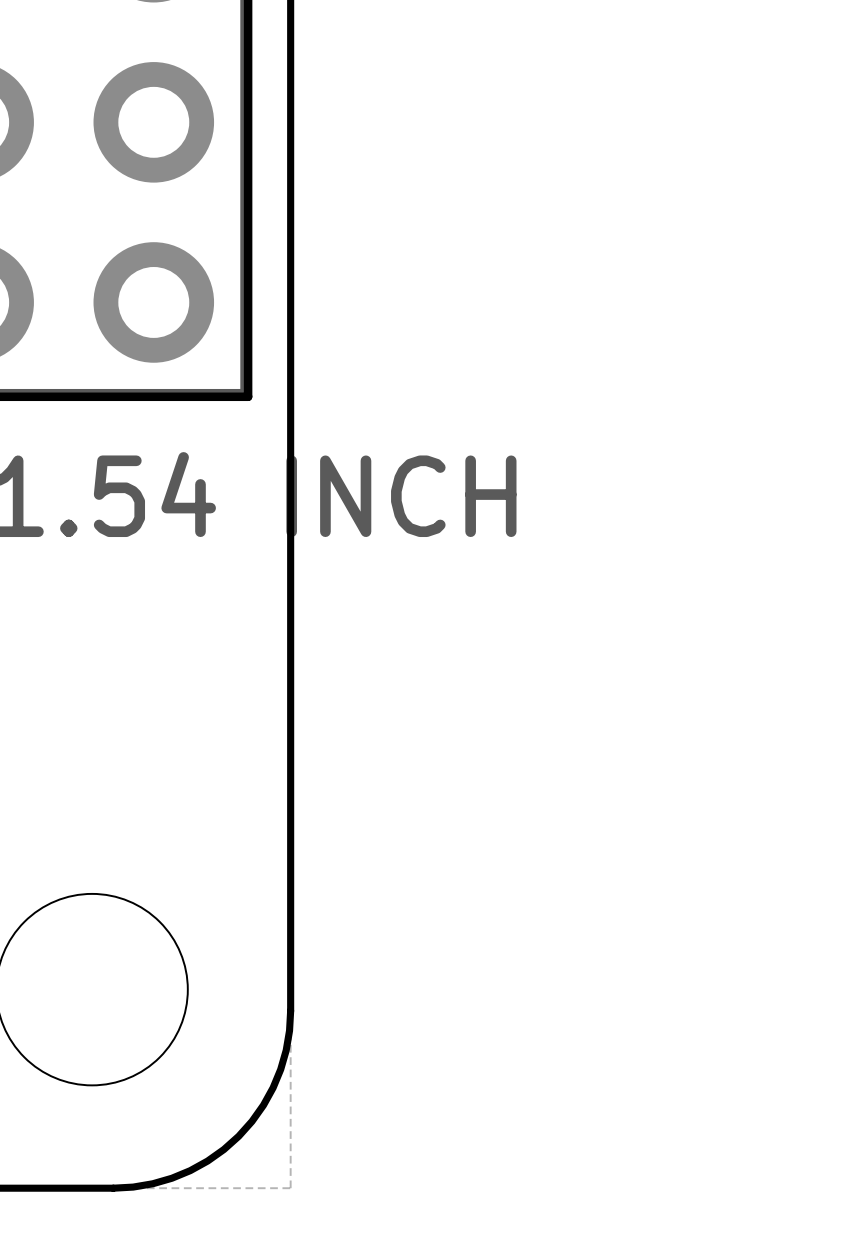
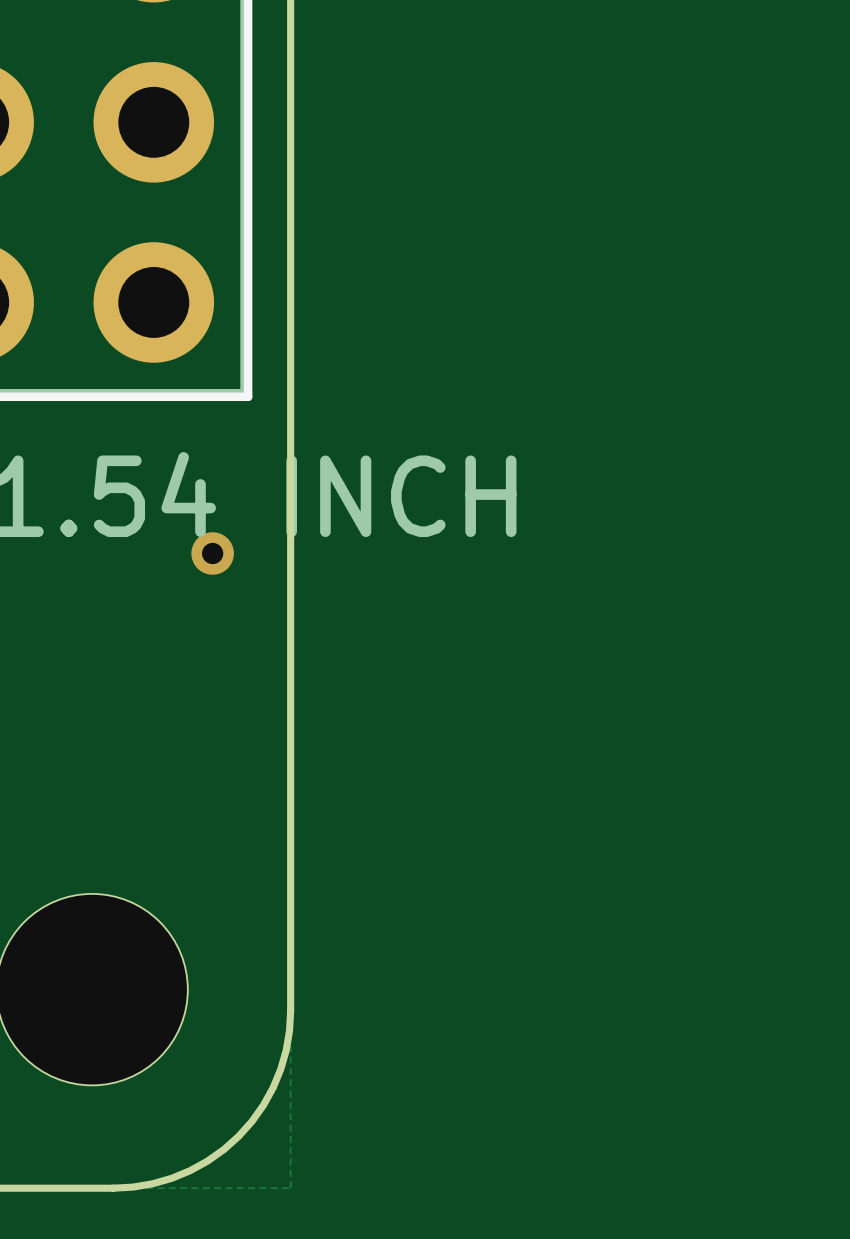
via: none -> (212, 553)

